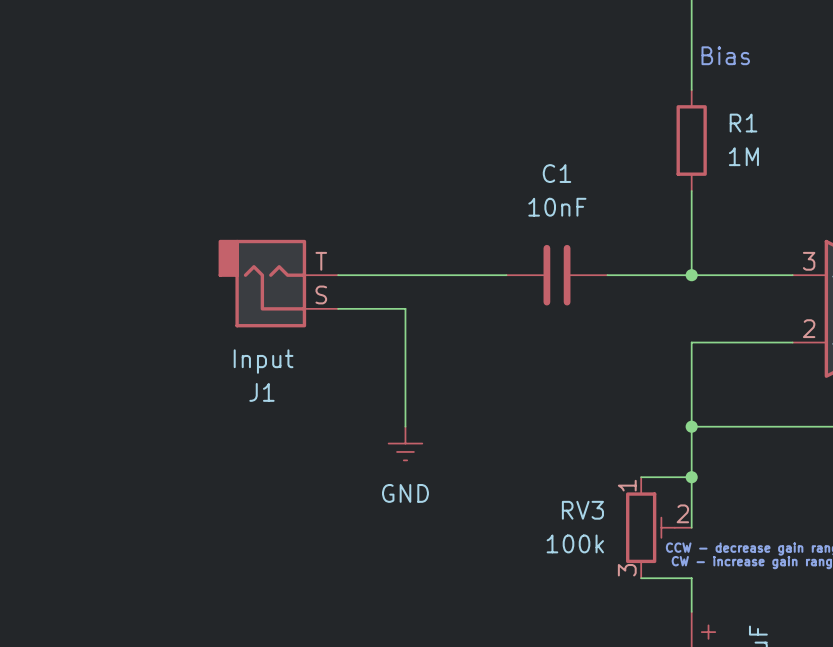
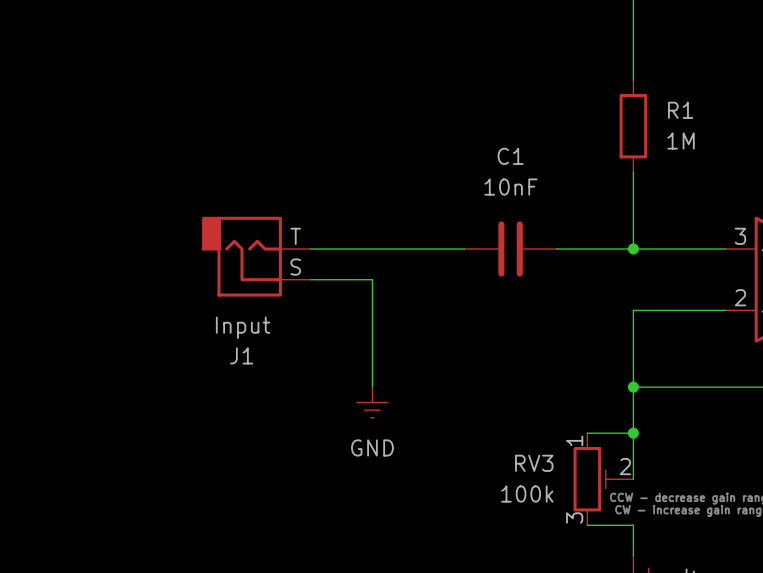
text: Bias (725, 55) -> none

